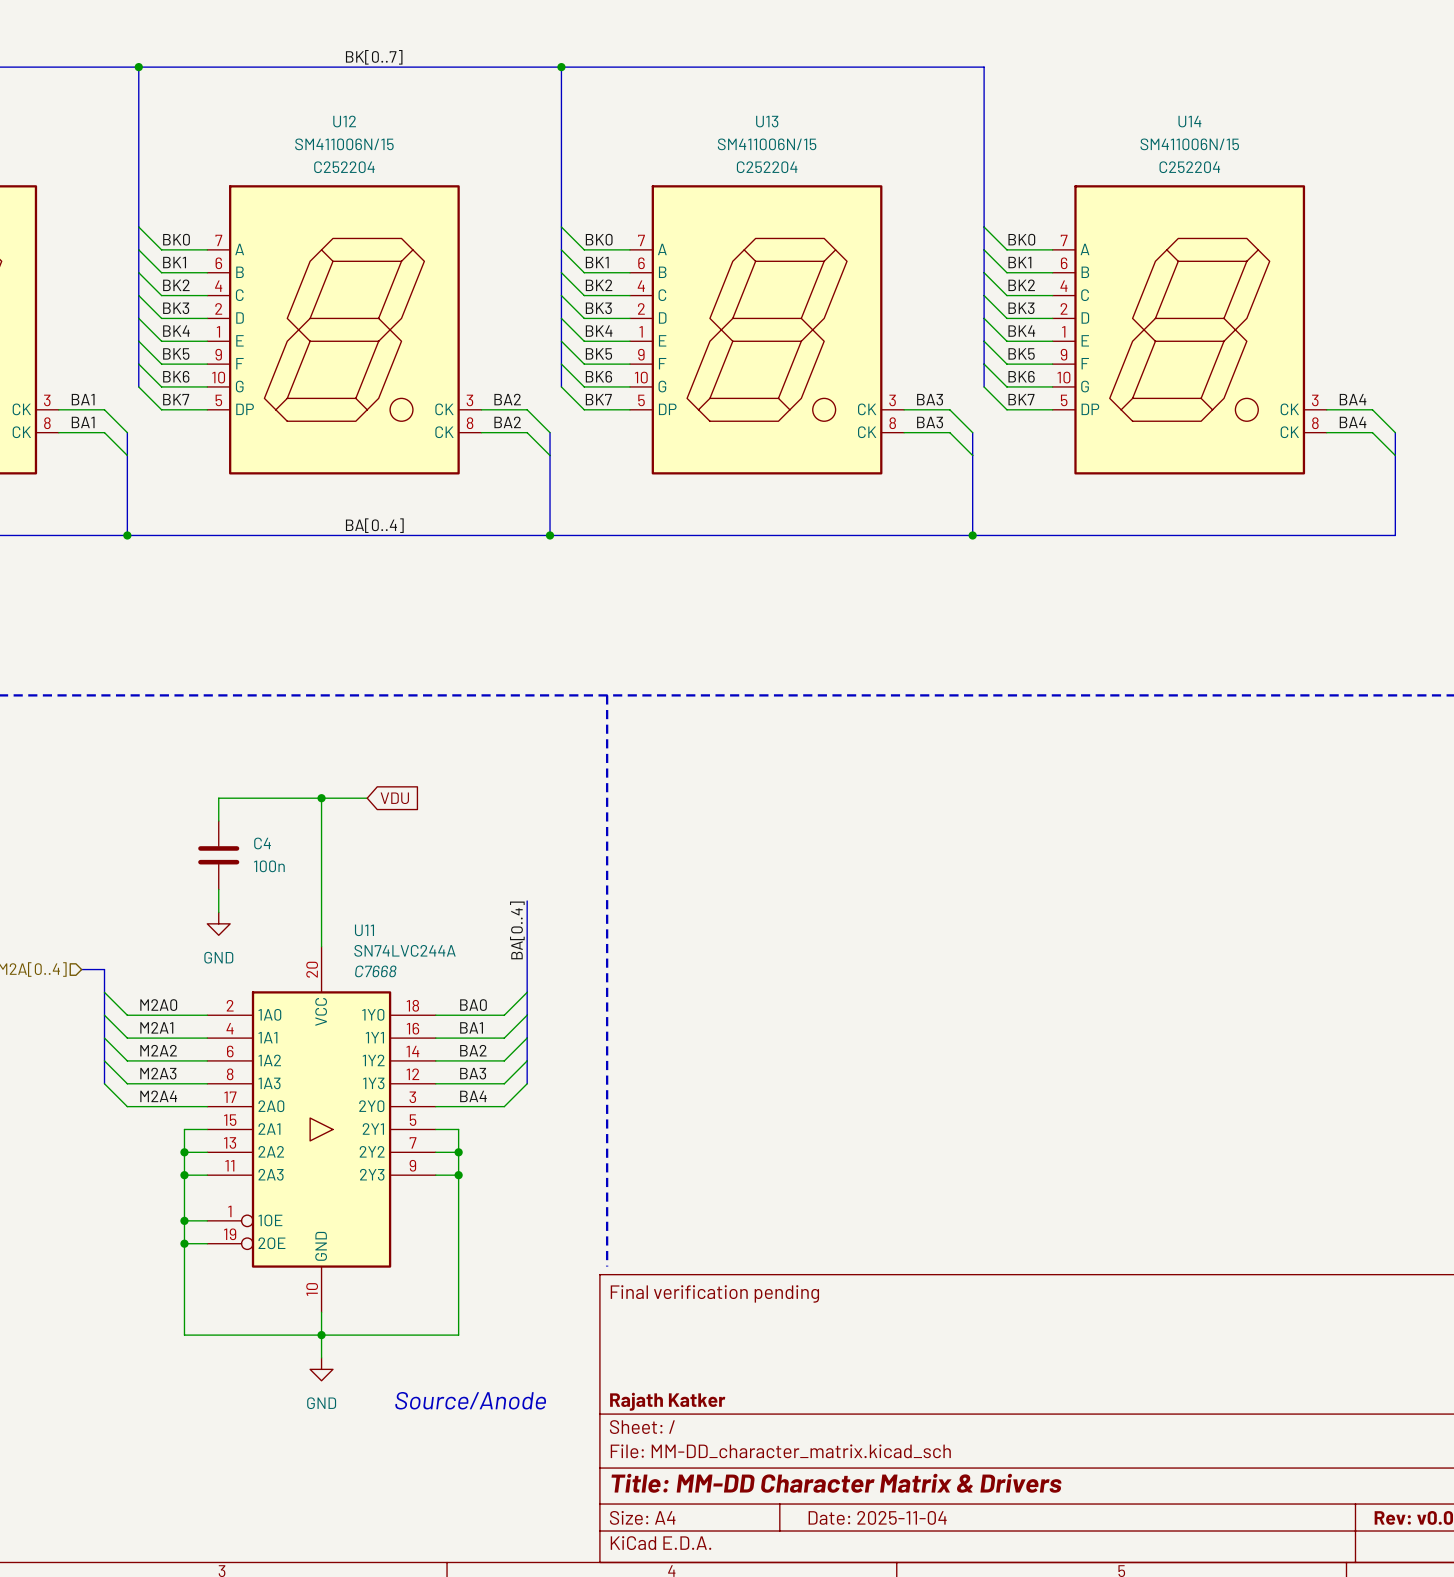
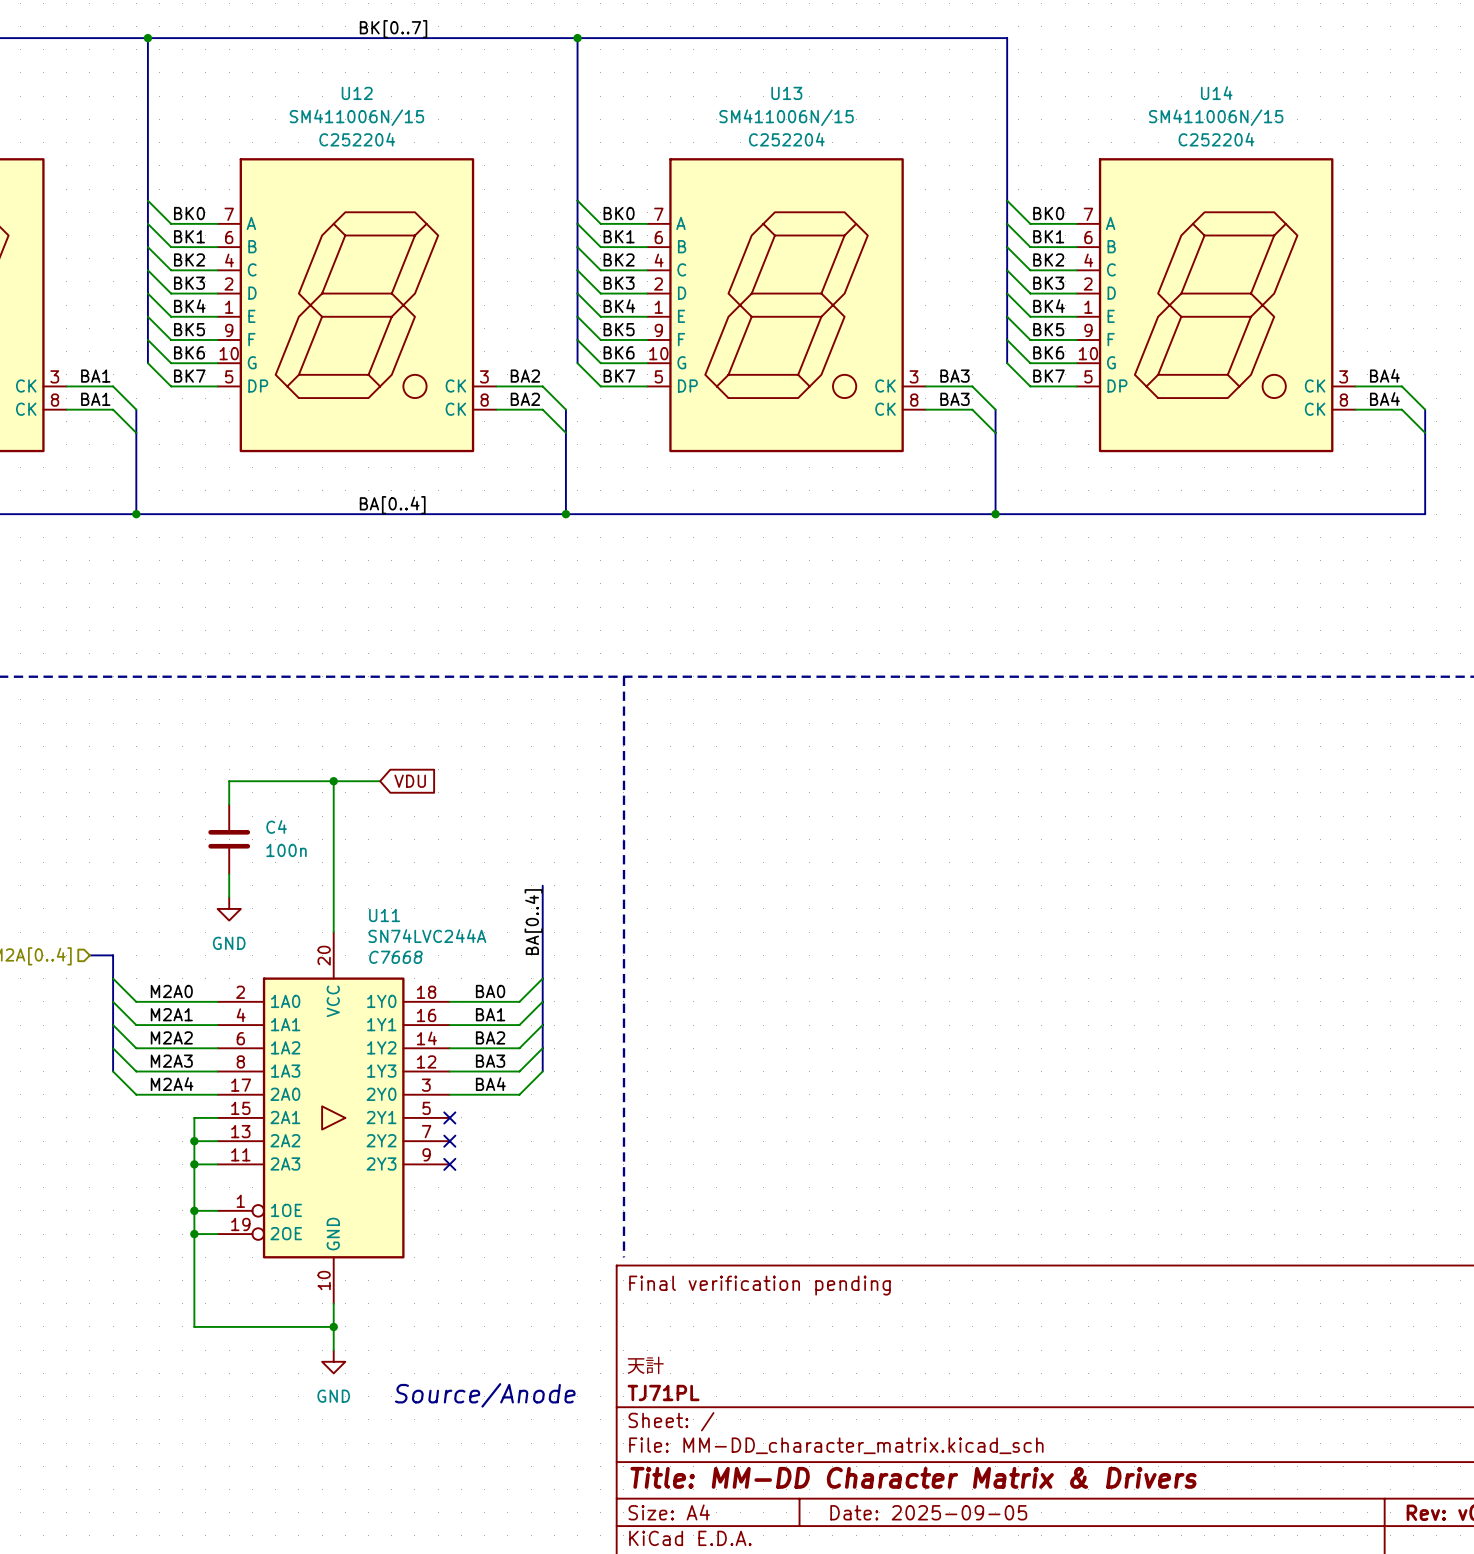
wire: (435, 1129) (458, 1129) (458, 1335) (321, 1335) -> none
no-connect mark: none -> (449, 1117)
wire: (435, 1152) (458, 1152) -> none
no-connect mark: none -> (449, 1141)
junction: (458, 1152) -> none
wire: (435, 1175) (458, 1175) -> none
no-connect mark: none -> (449, 1164)
junction: (458, 1175) -> none
title block: none -> 天計 (645, 1365)
title block: Rajath Katker (667, 1401) -> TJ71PL (663, 1393)
title block: Date: 2025-11-04 (877, 1517) -> Date: 2025-09-05 (928, 1512)

